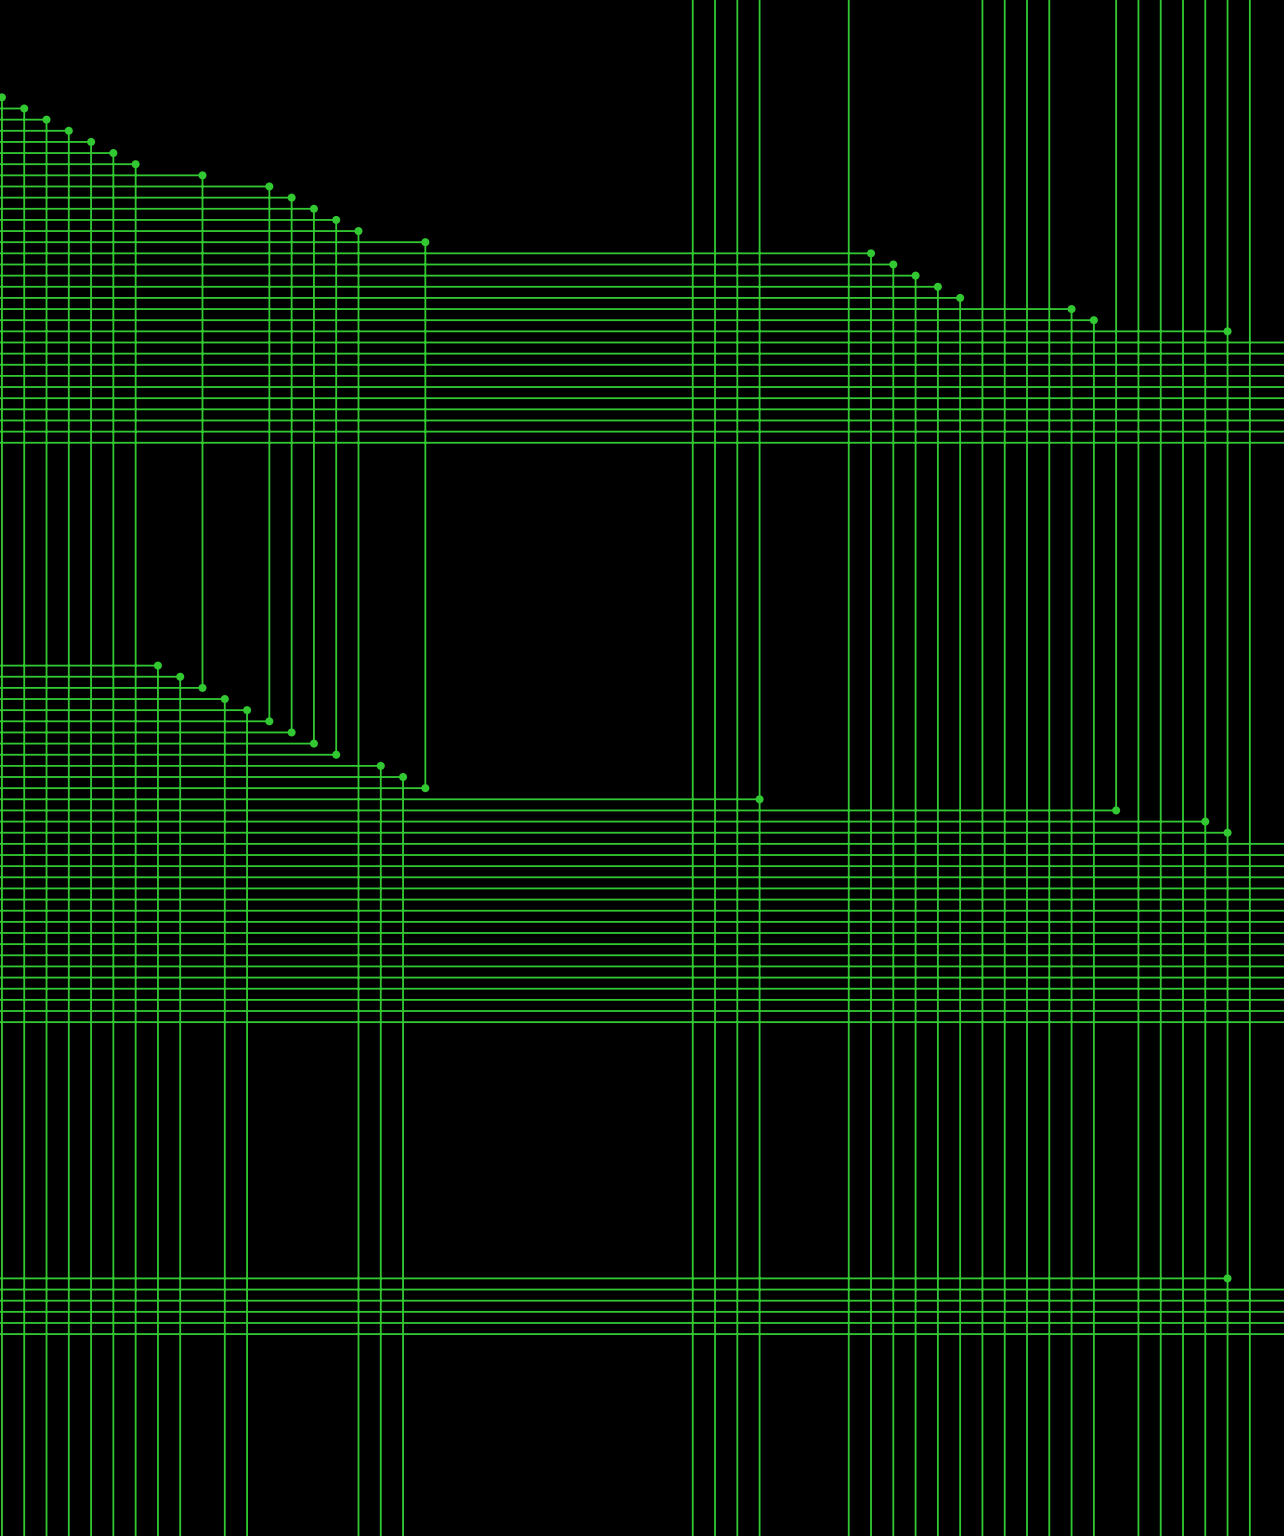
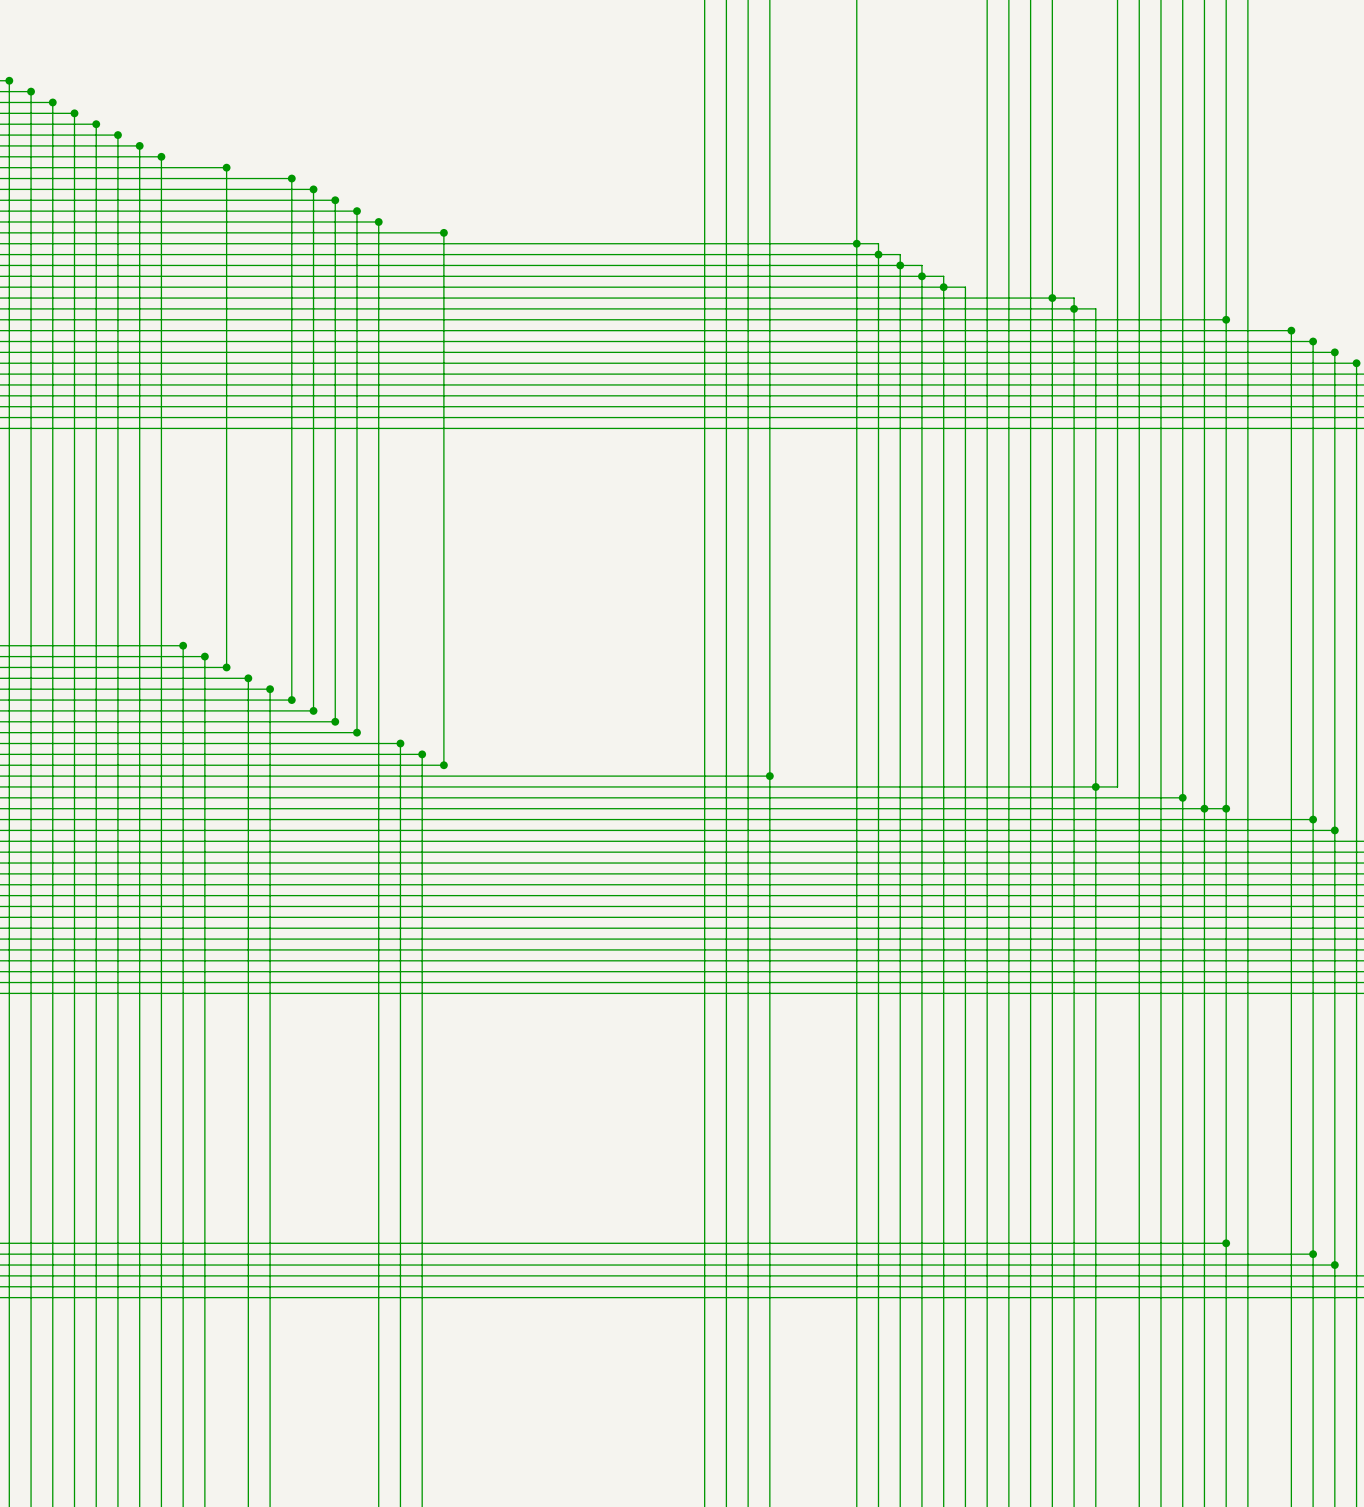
junction: none -> (856, 243)
junction: (871, 253) -> none
junction: none -> (878, 254)
junction: (893, 264) -> none
junction: none -> (900, 265)
junction: (915, 275) -> none
junction: none -> (921, 276)
junction: (937, 286) -> none
junction: none -> (943, 287)
junction: (960, 297) -> none
junction: none -> (1052, 298)
junction: (1071, 309) -> none
junction: none -> (1074, 308)
junction: (1093, 320) -> none
junction position: (1116, 810) -> (1095, 786)
wire: (1182, 821) (1205, 821) -> none
junction: none -> (1182, 797)
junction: (1205, 821) -> none
junction: none -> (1204, 808)

